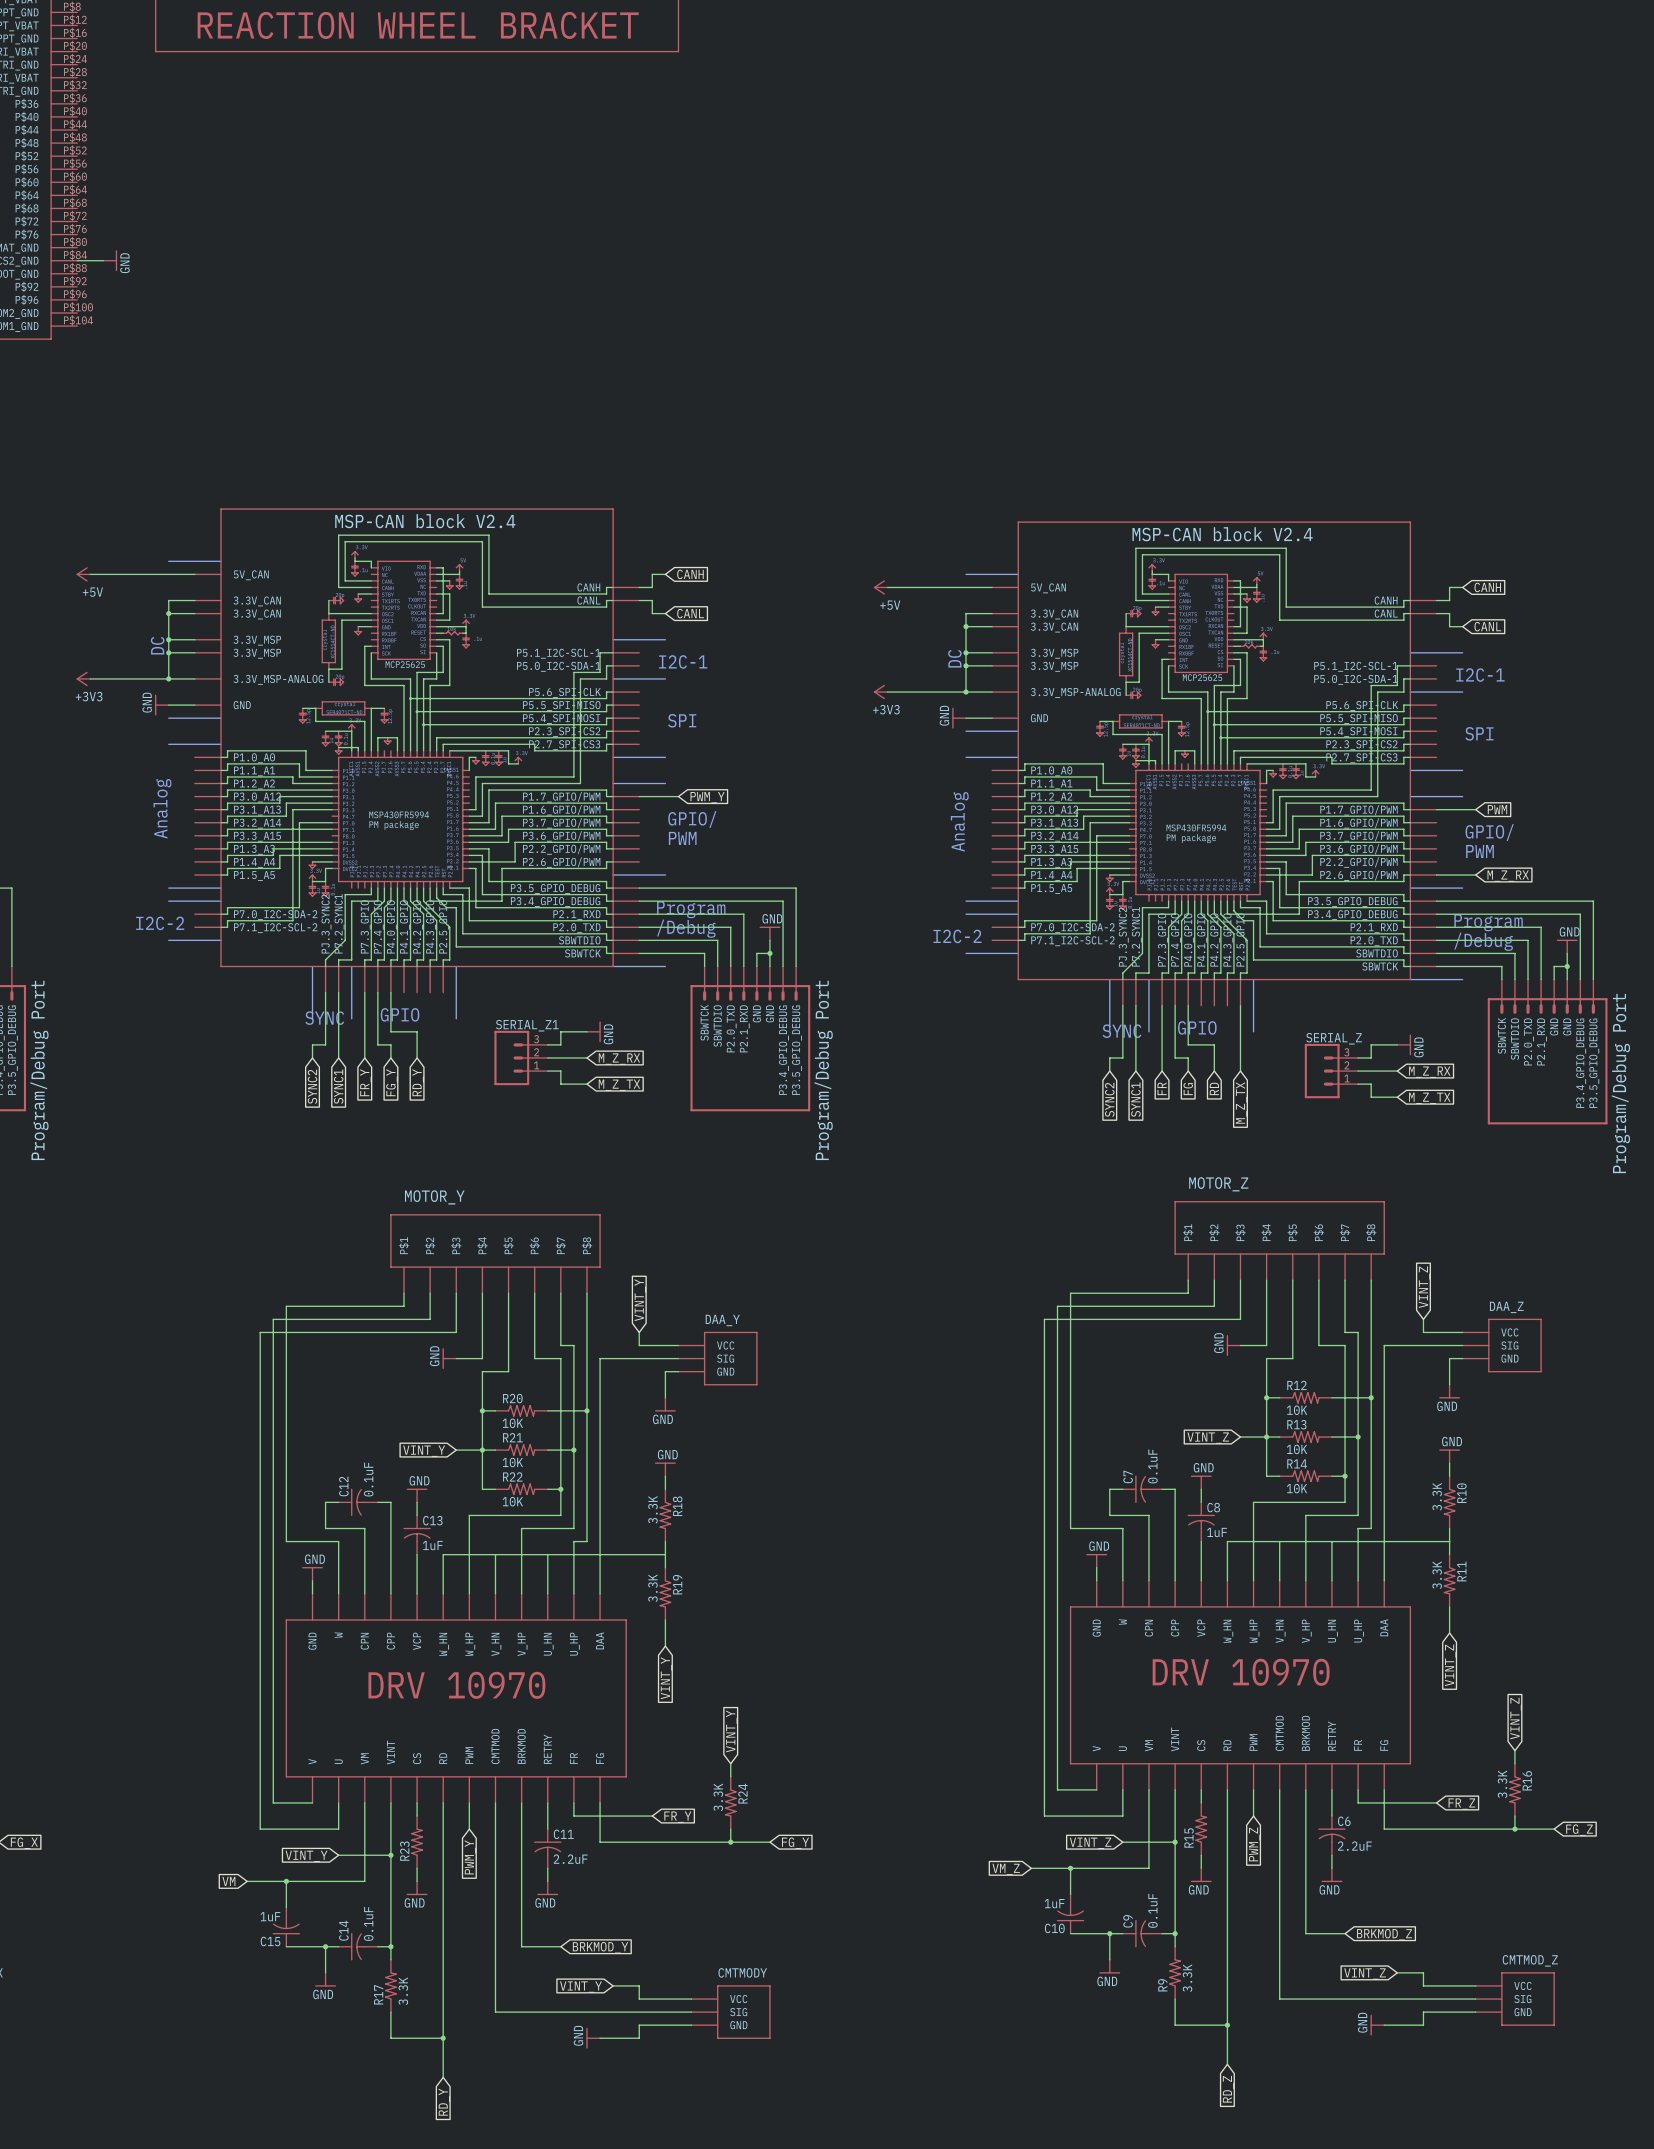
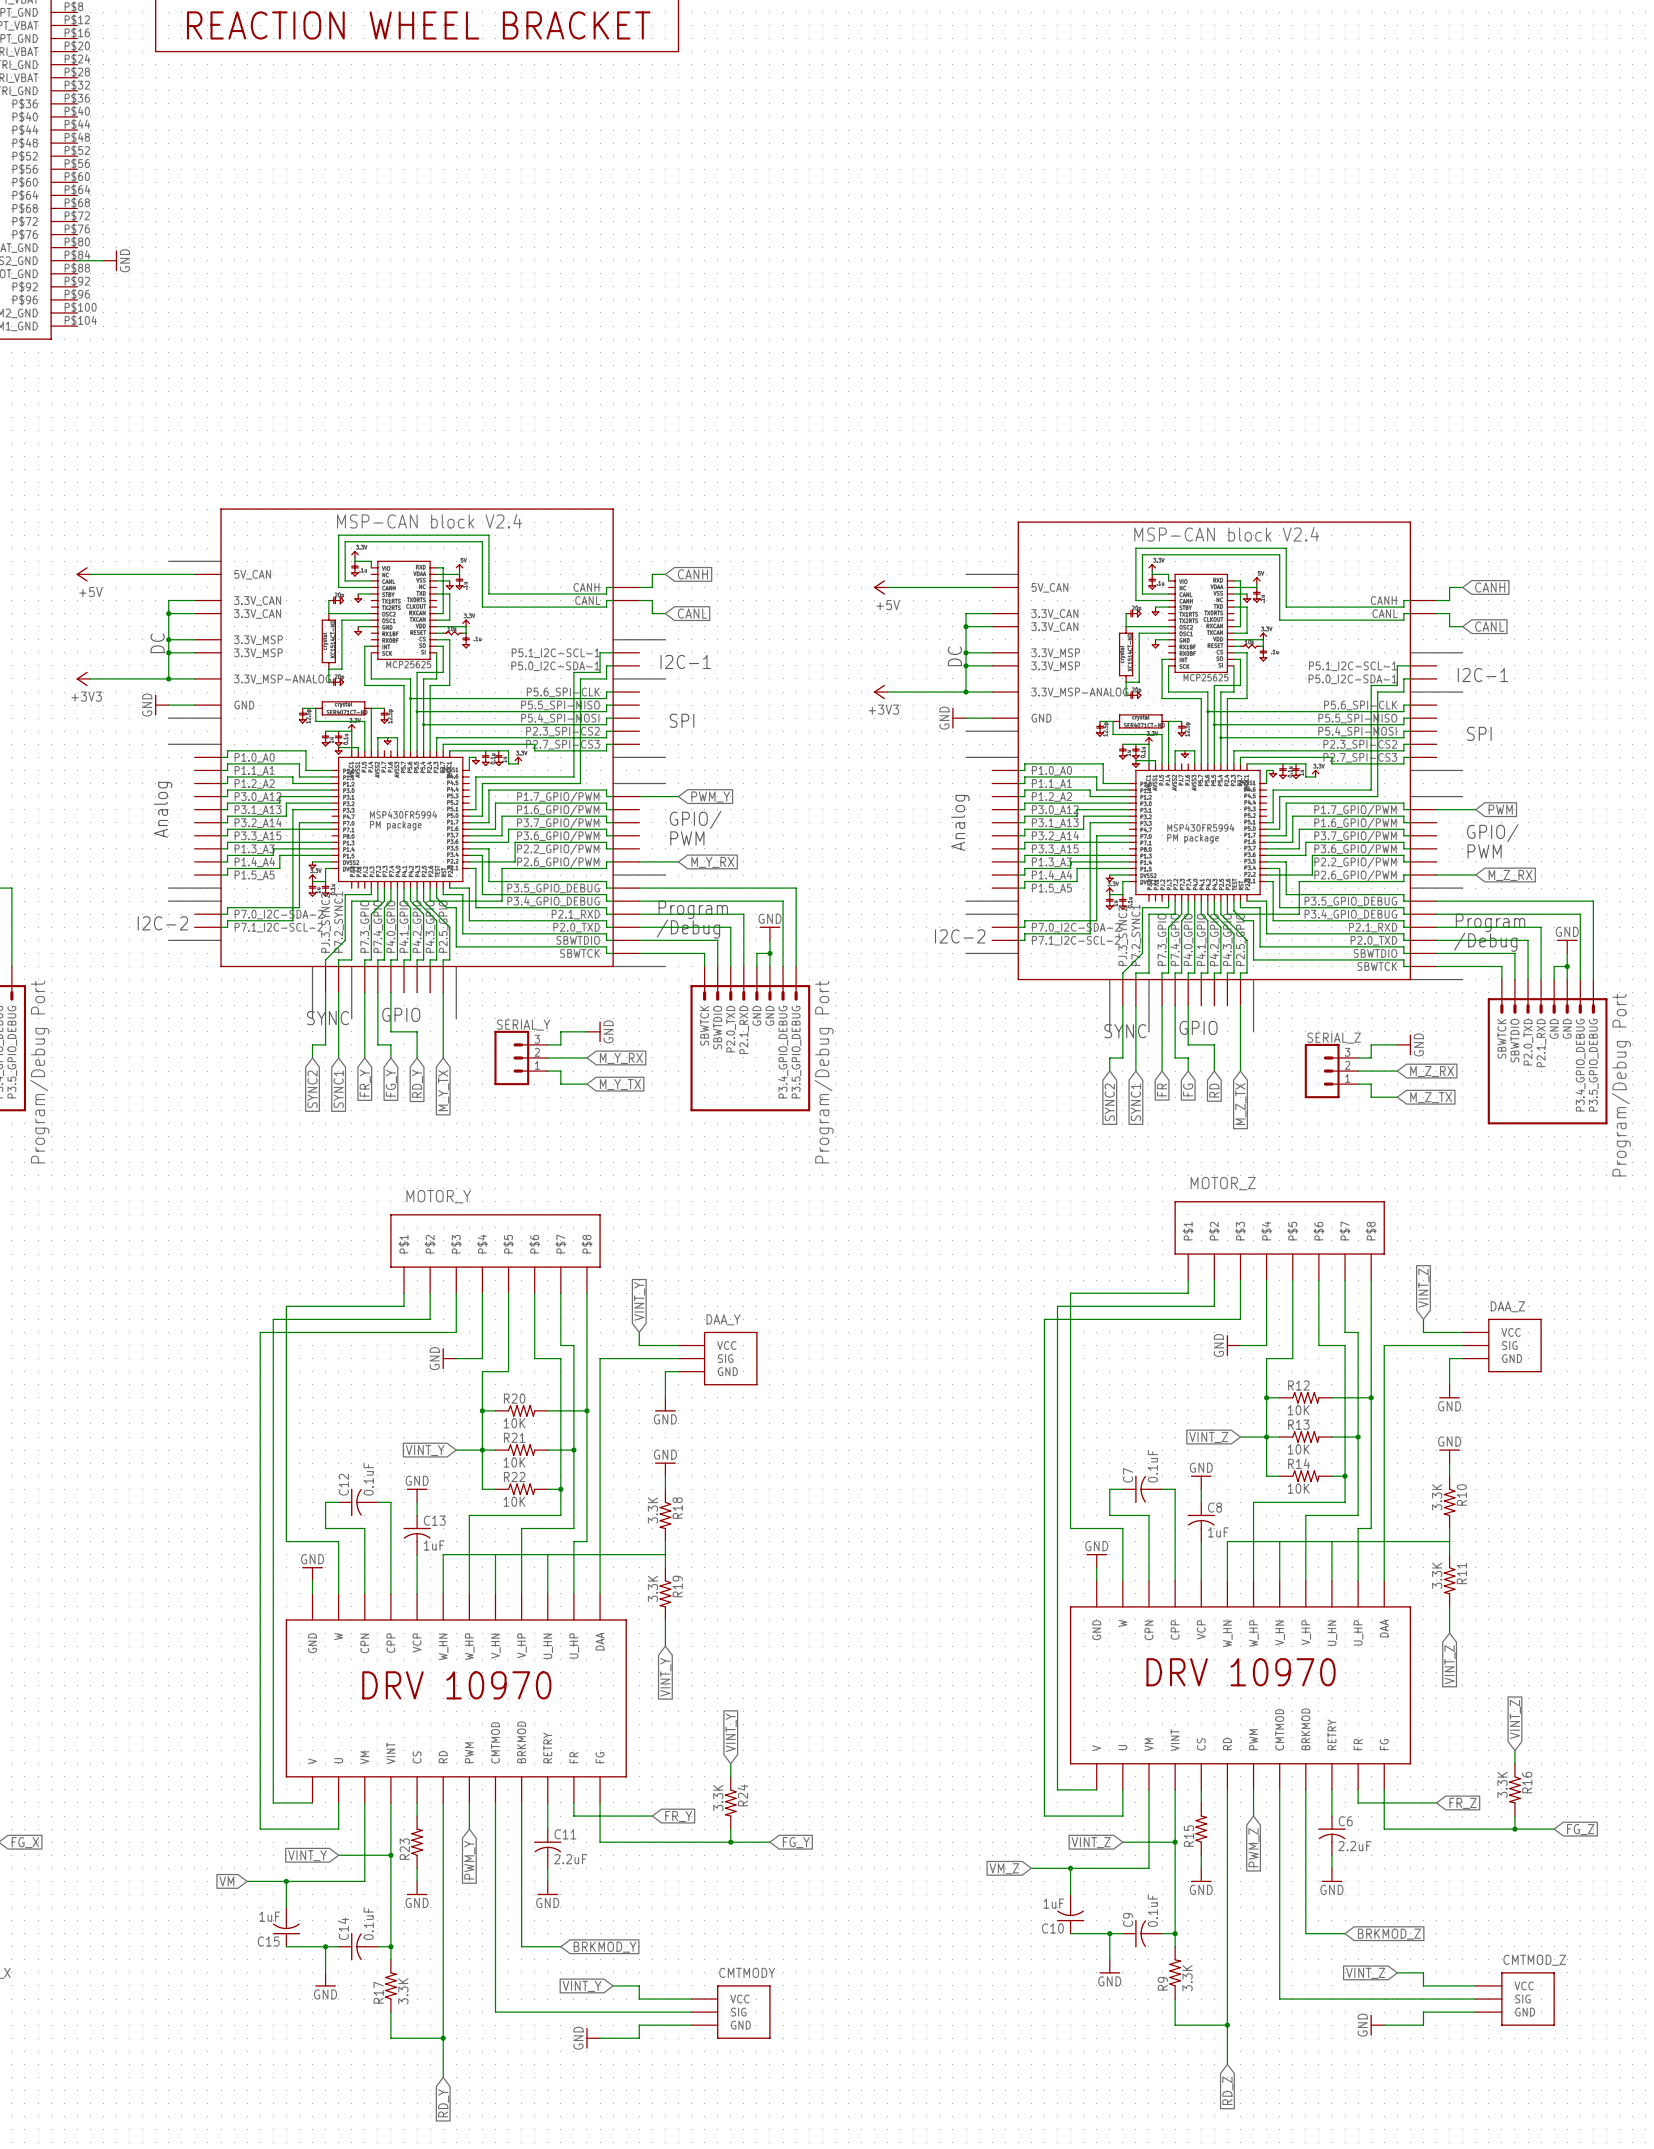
wire: none -> (639, 861) (678, 861)
global label: none -> M_Y_RX (712, 862)
wire: none -> (443, 992) (443, 1057)
SERIAL_Z1 name: SERIAL_Z1 (527, 1025) -> SERIAL_Y (523, 1025)
global label: M_Z_RX (619, 1059) -> M_Y_RX (621, 1058)
global label: M_Z_TX (619, 1085) -> M_Y_TX (620, 1084)
global label: none -> M_Y_TX (443, 1090)

